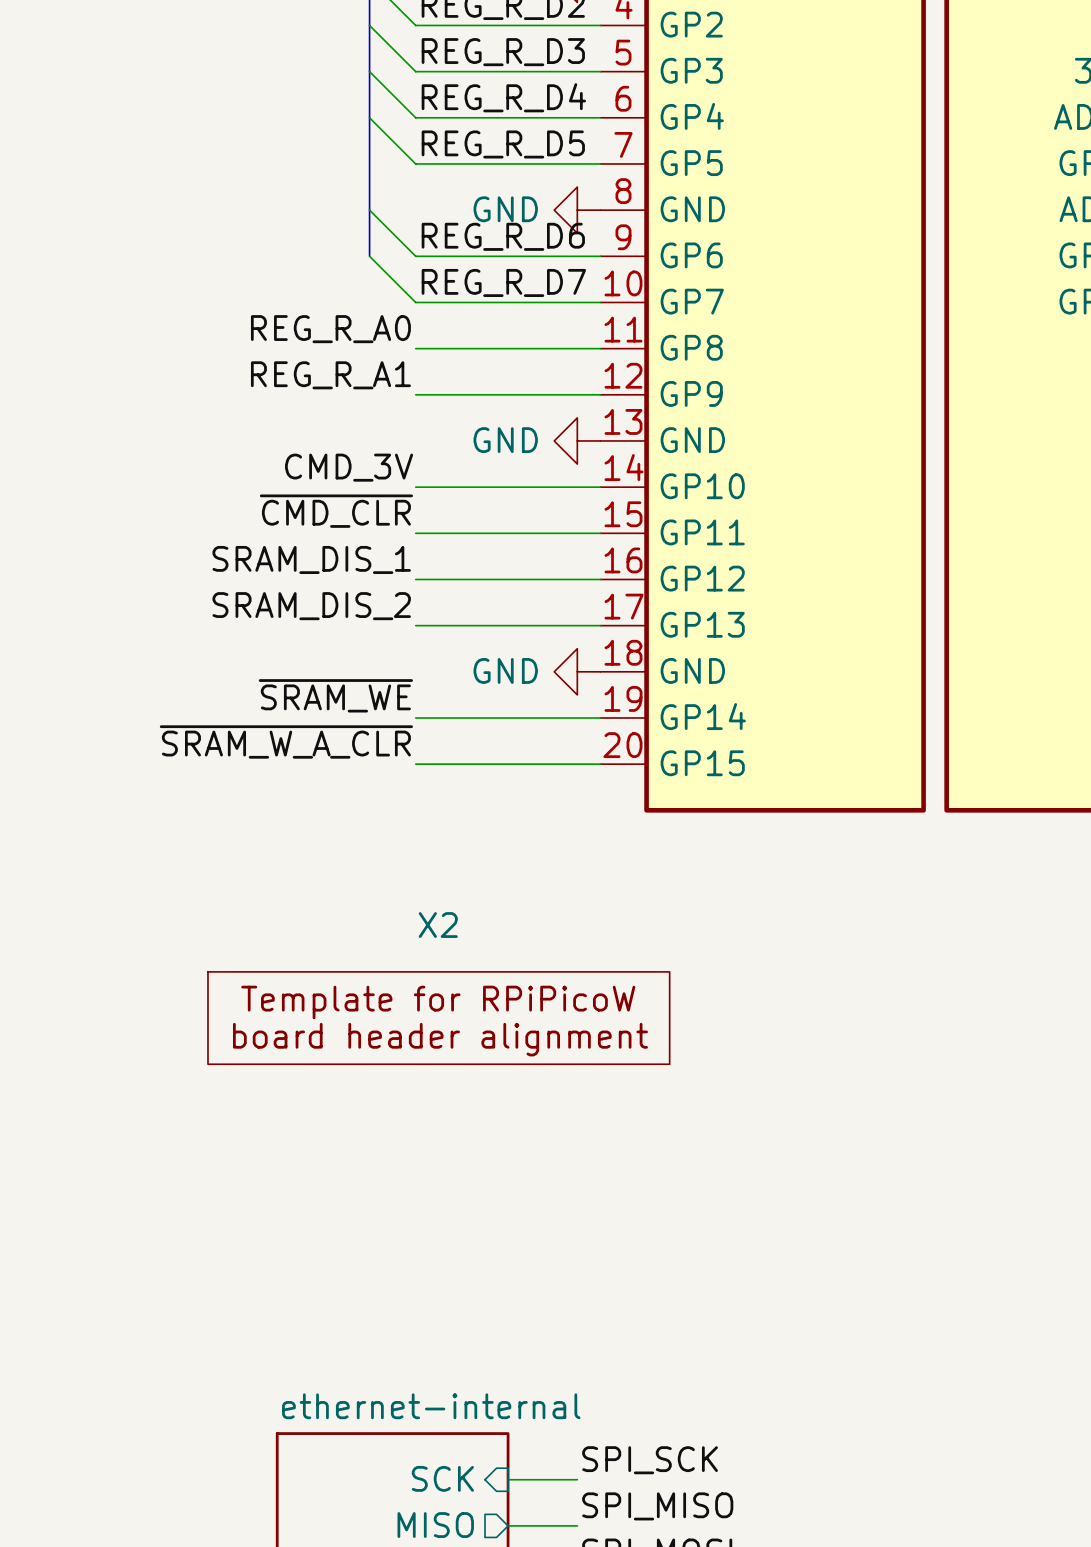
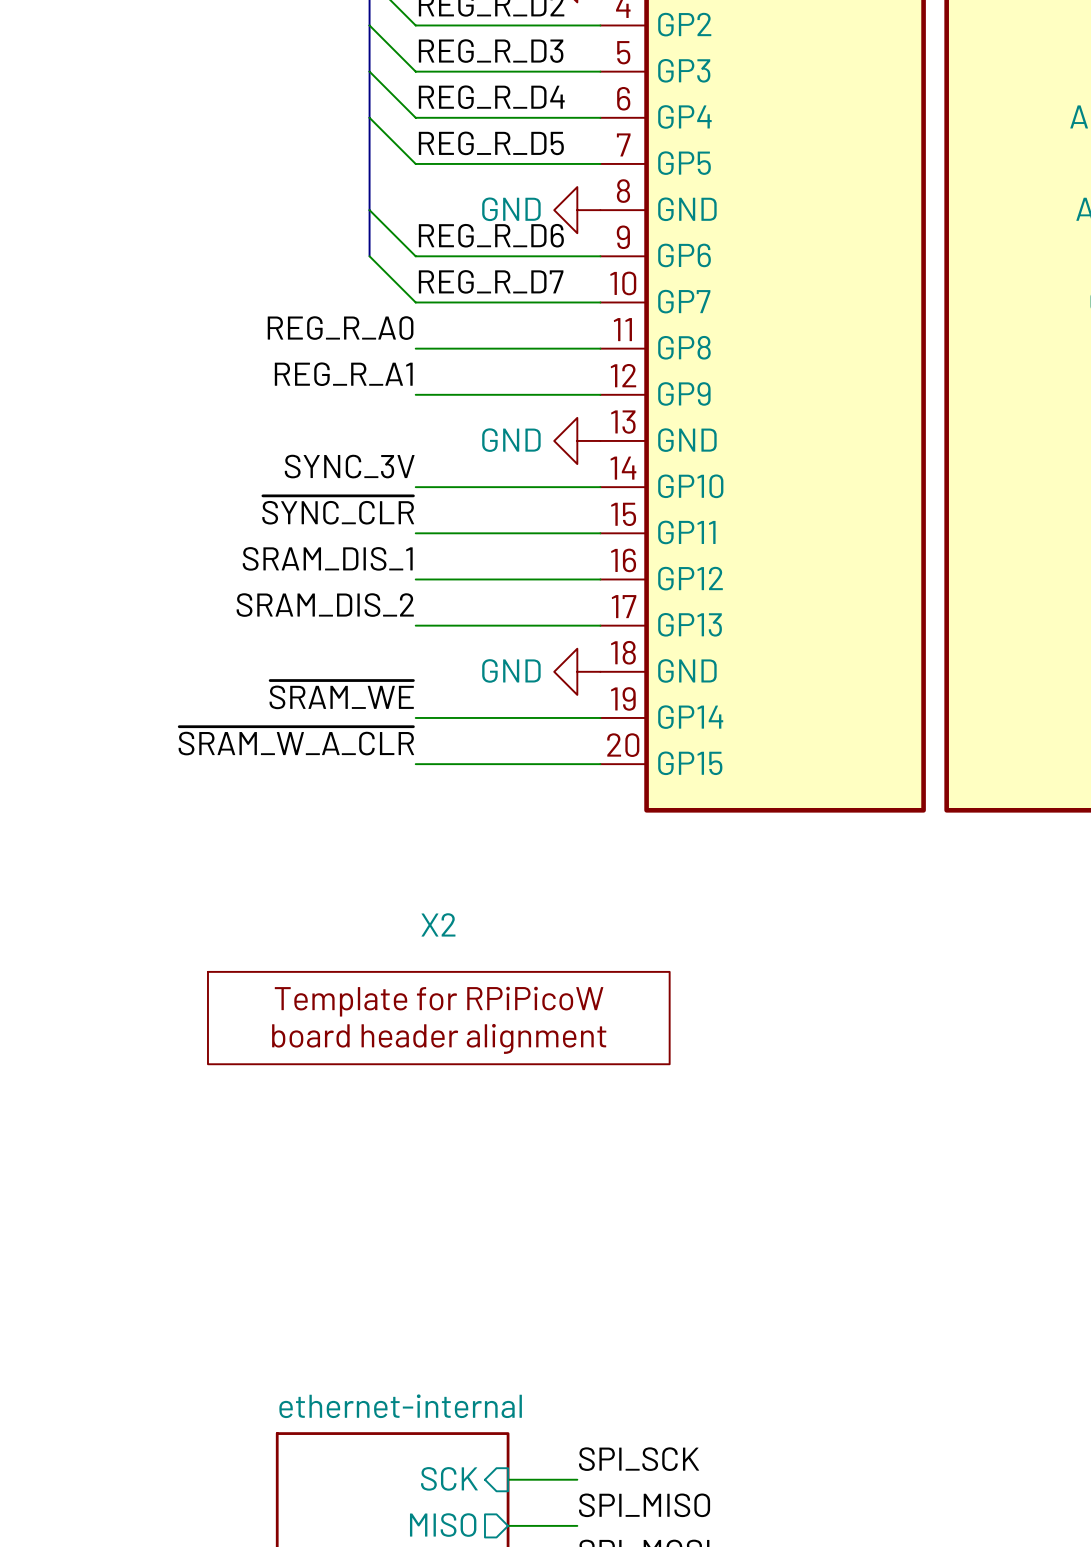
label: CMD_3V (349, 467) -> SYNC_3V (349, 466)
label: ~{CMD_CLR} (336, 511) -> ~{SYNC_CLR} (338, 510)

